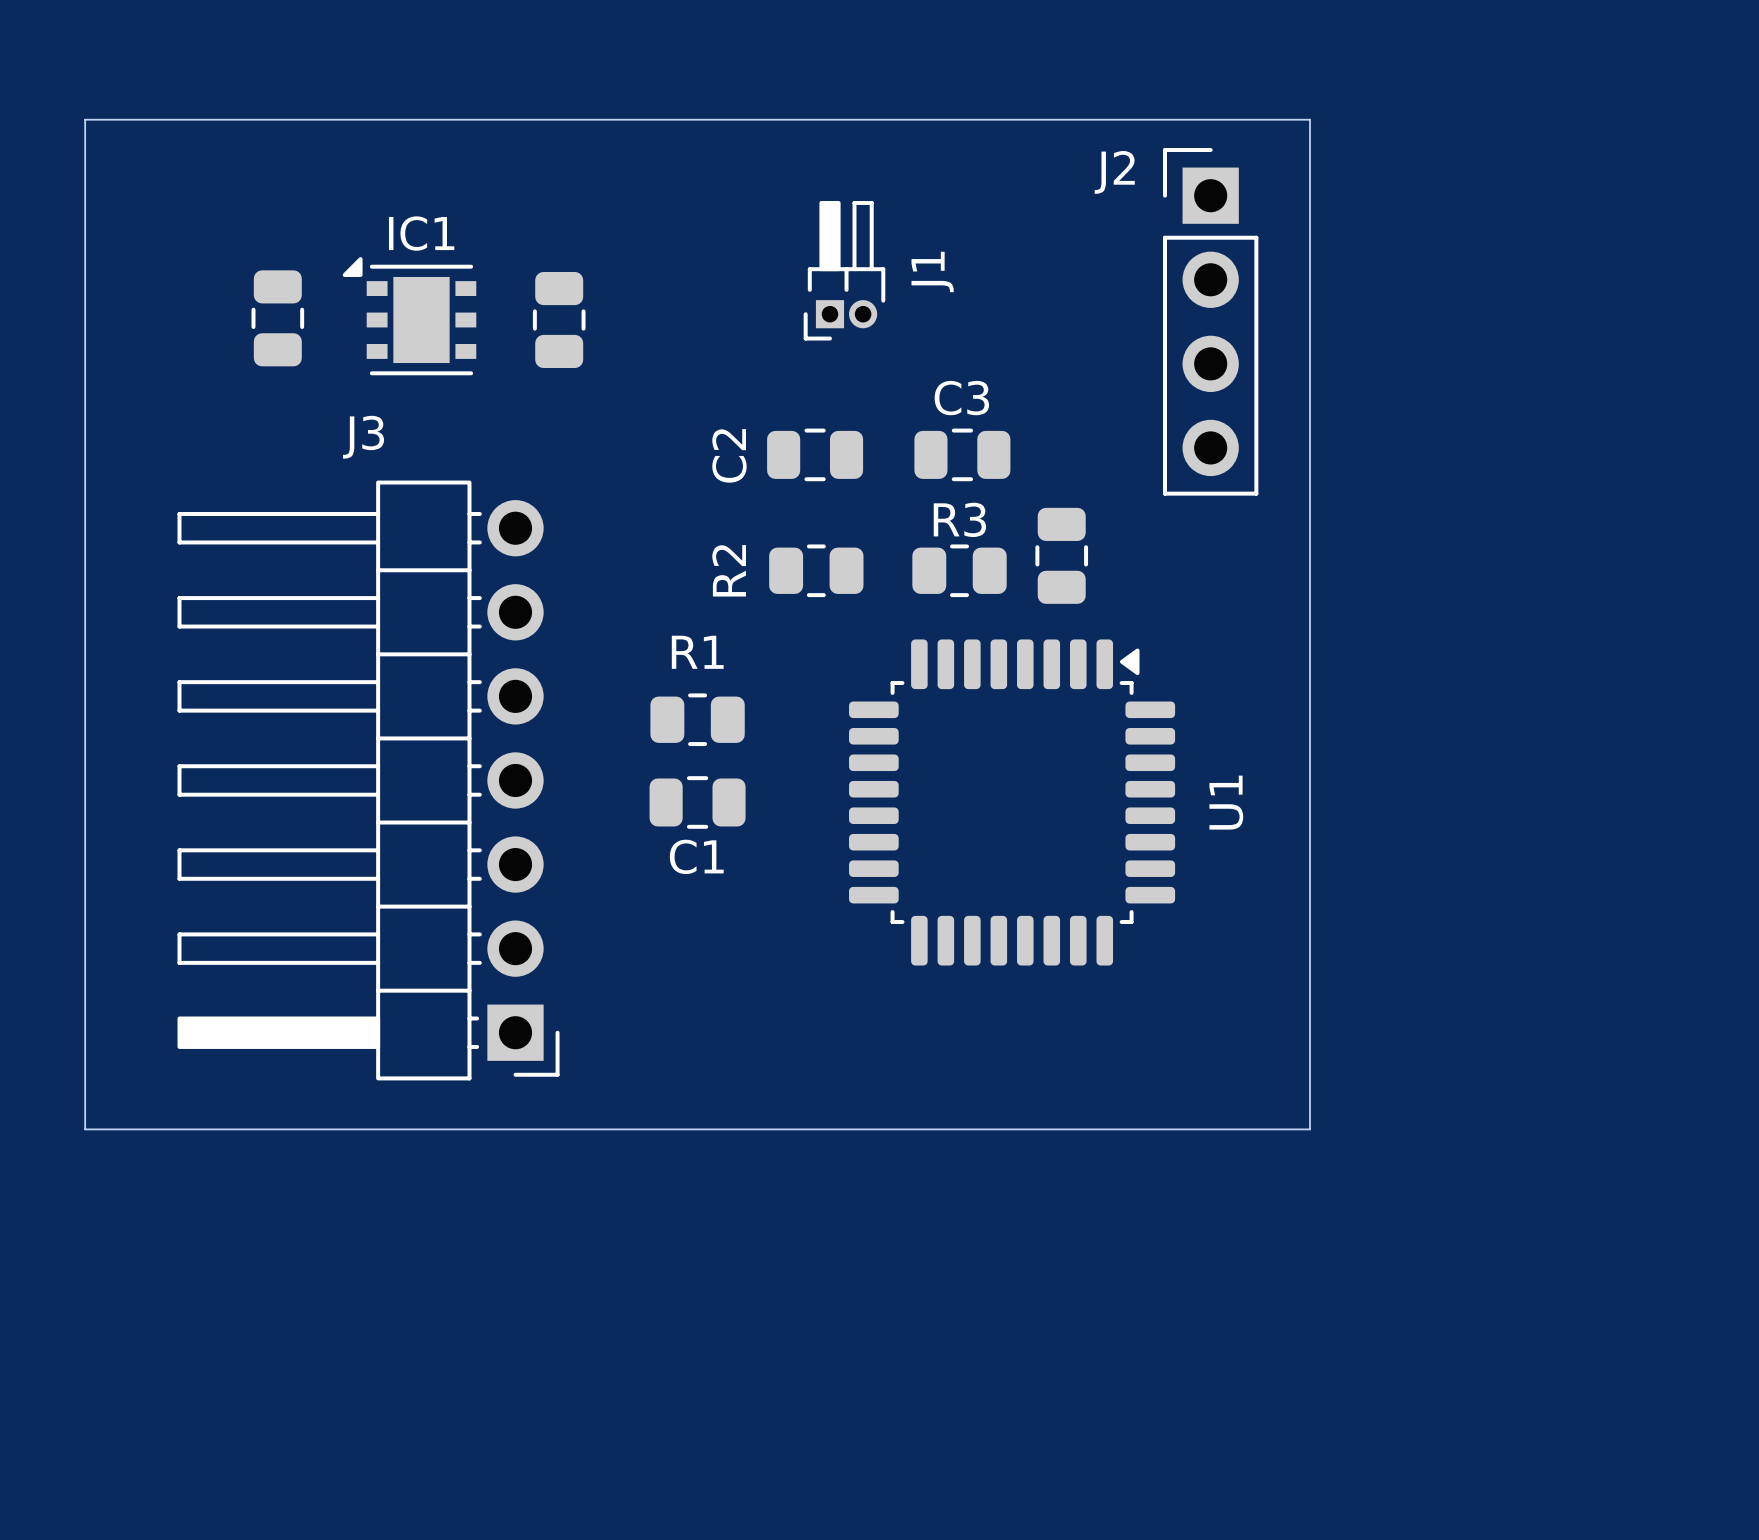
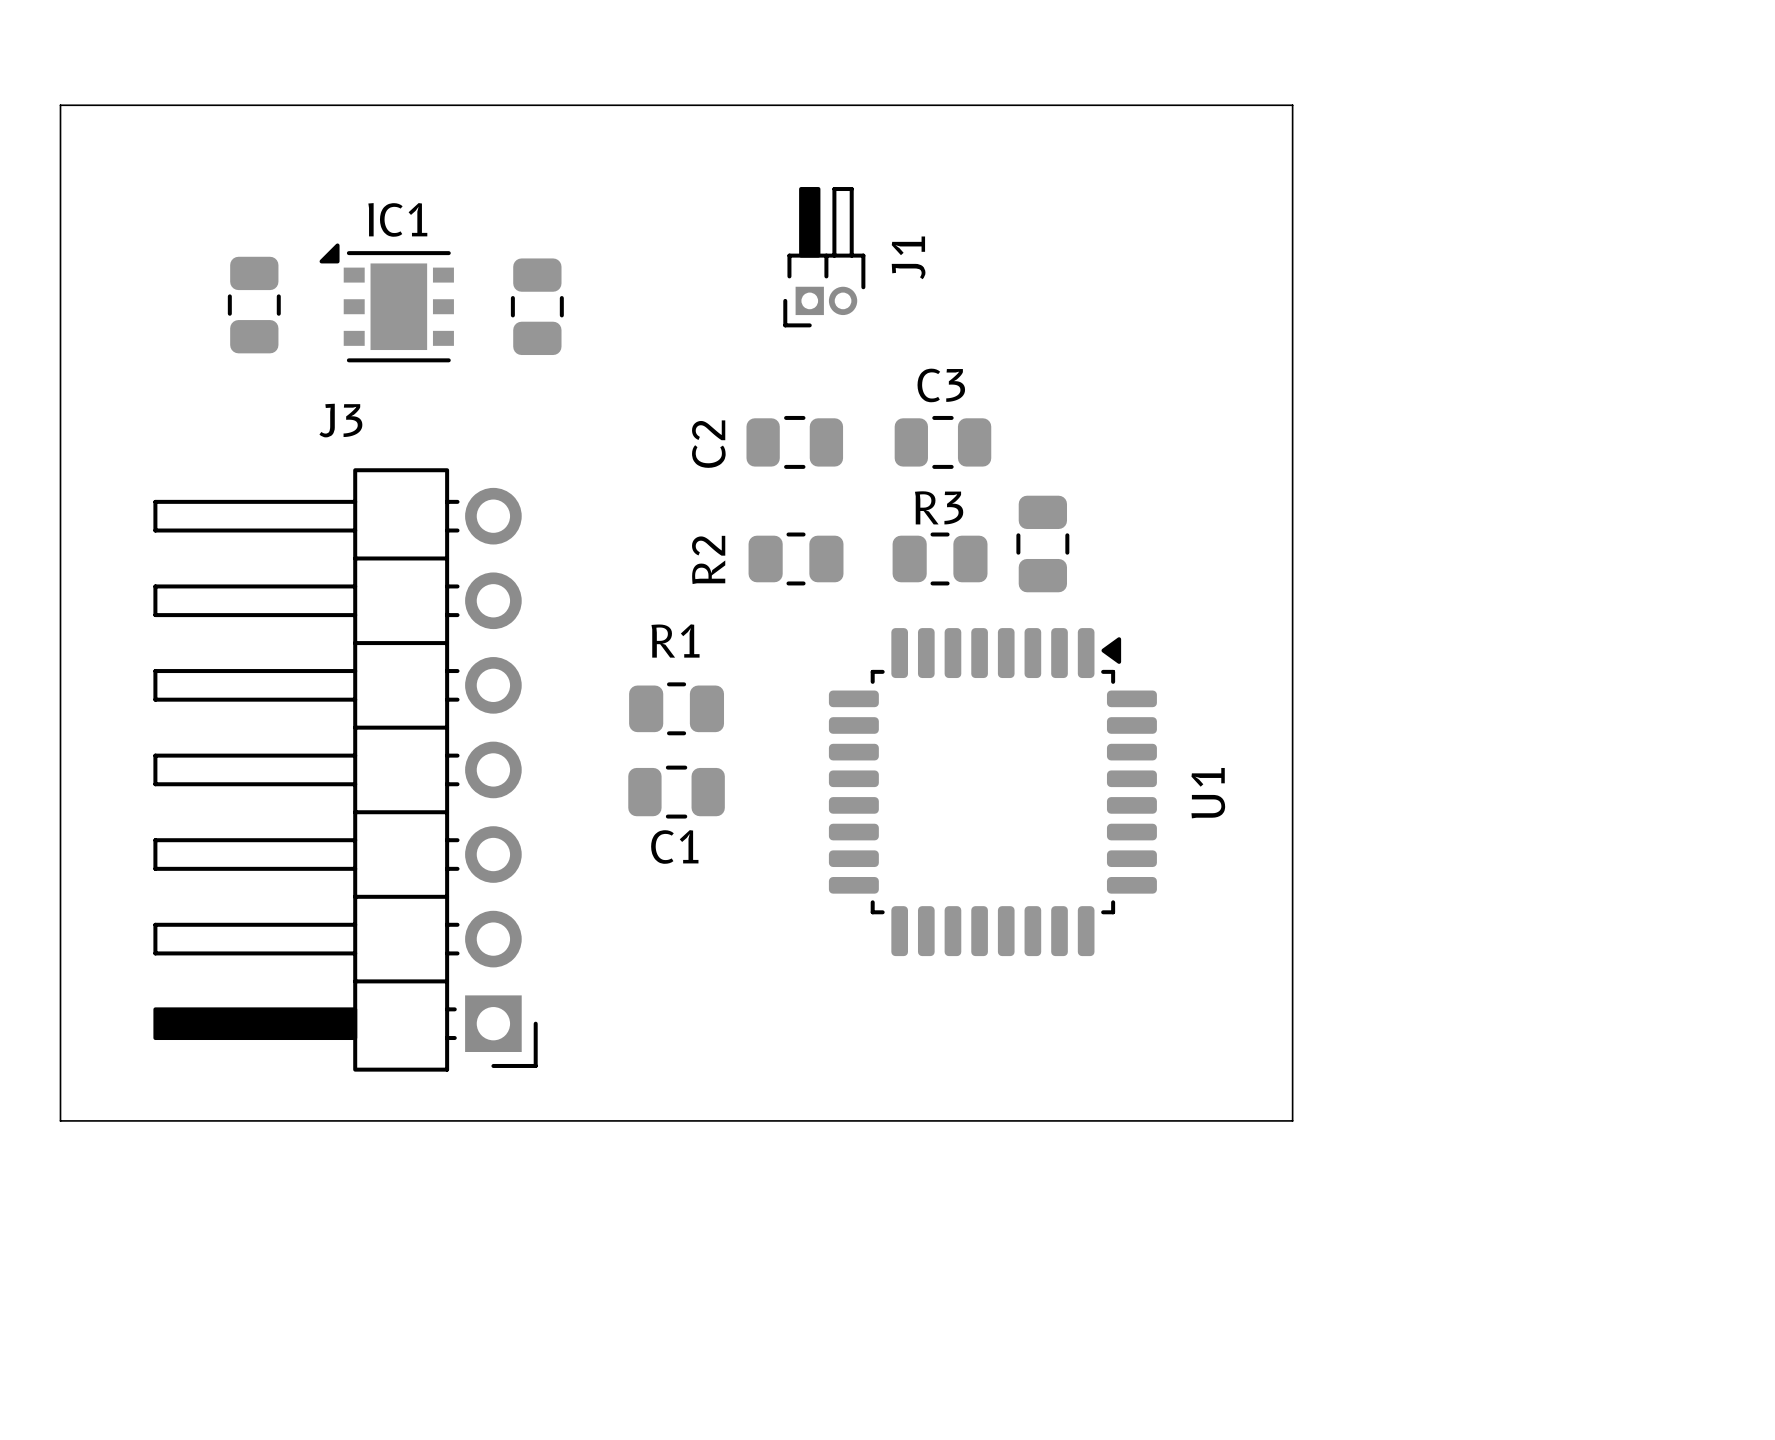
J2: (1210, 321) -> none

